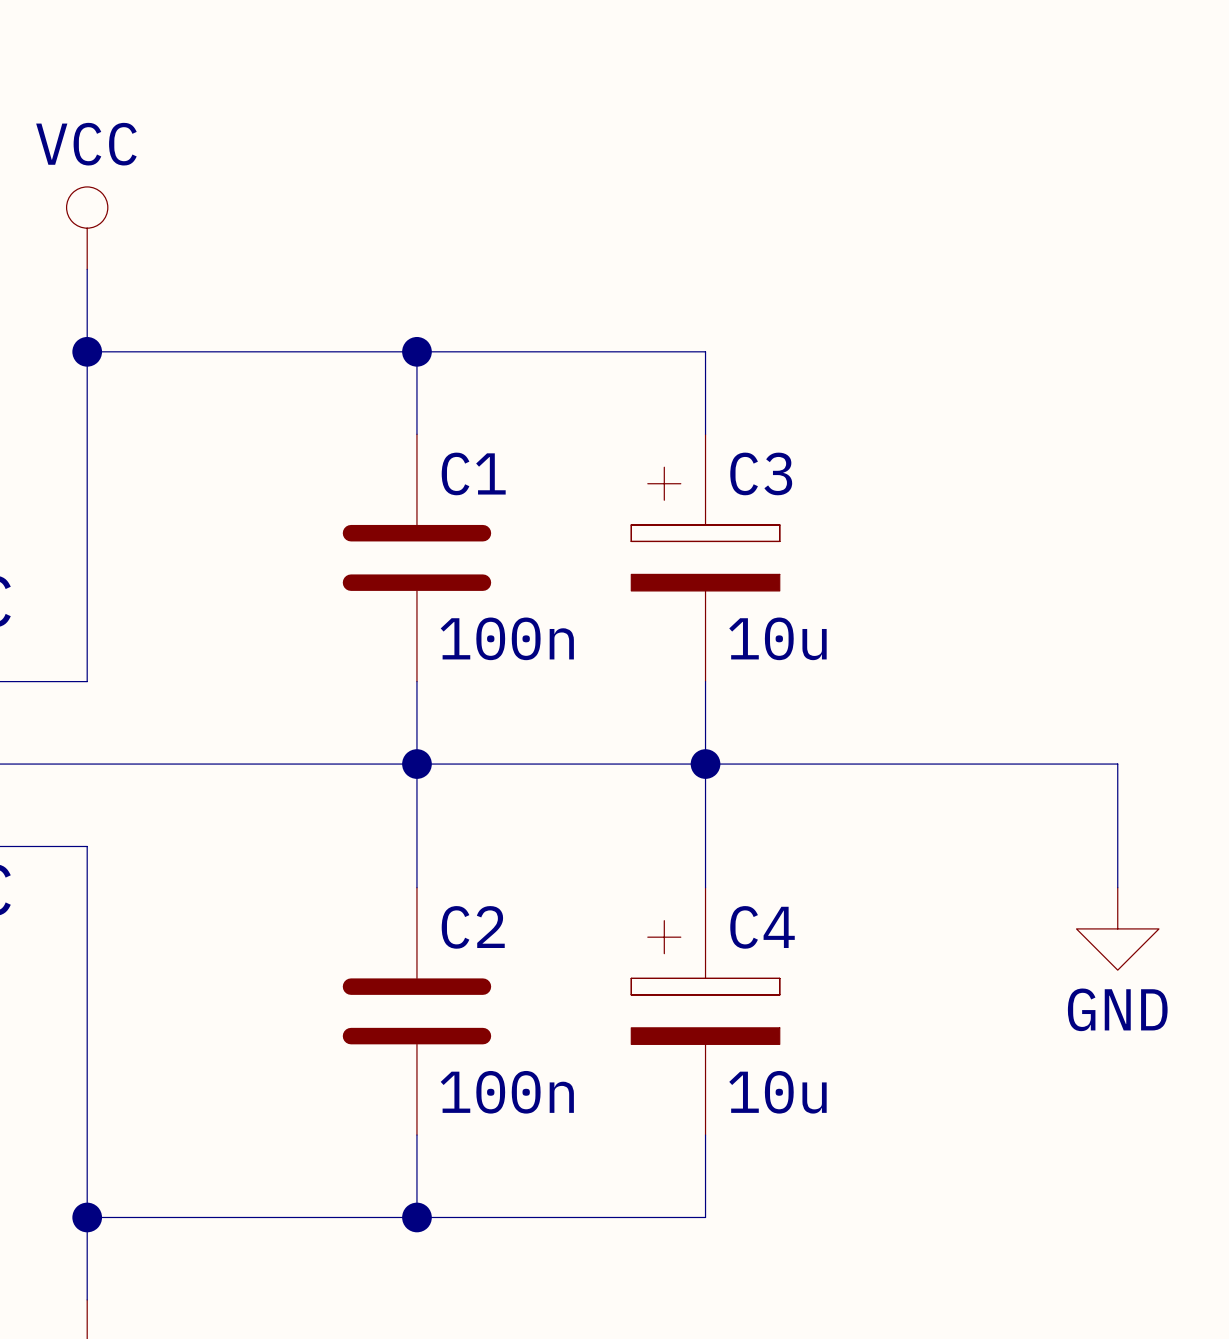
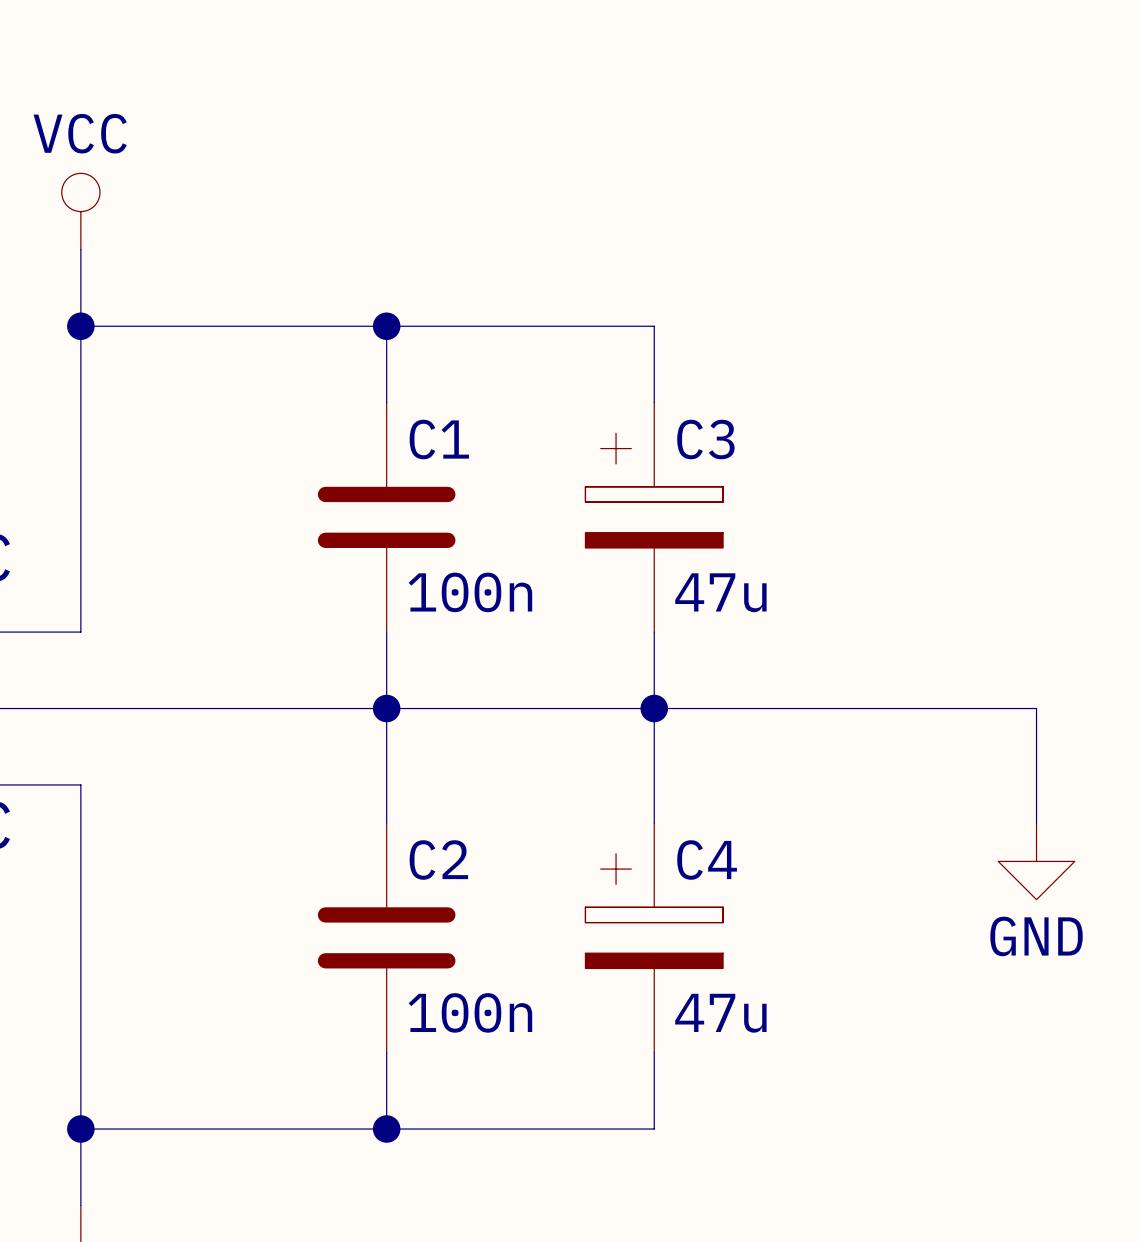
C3 value: 10u (777, 638) -> 47u (720, 592)
C4 value: 10u (777, 1092) -> 47u (720, 1013)

